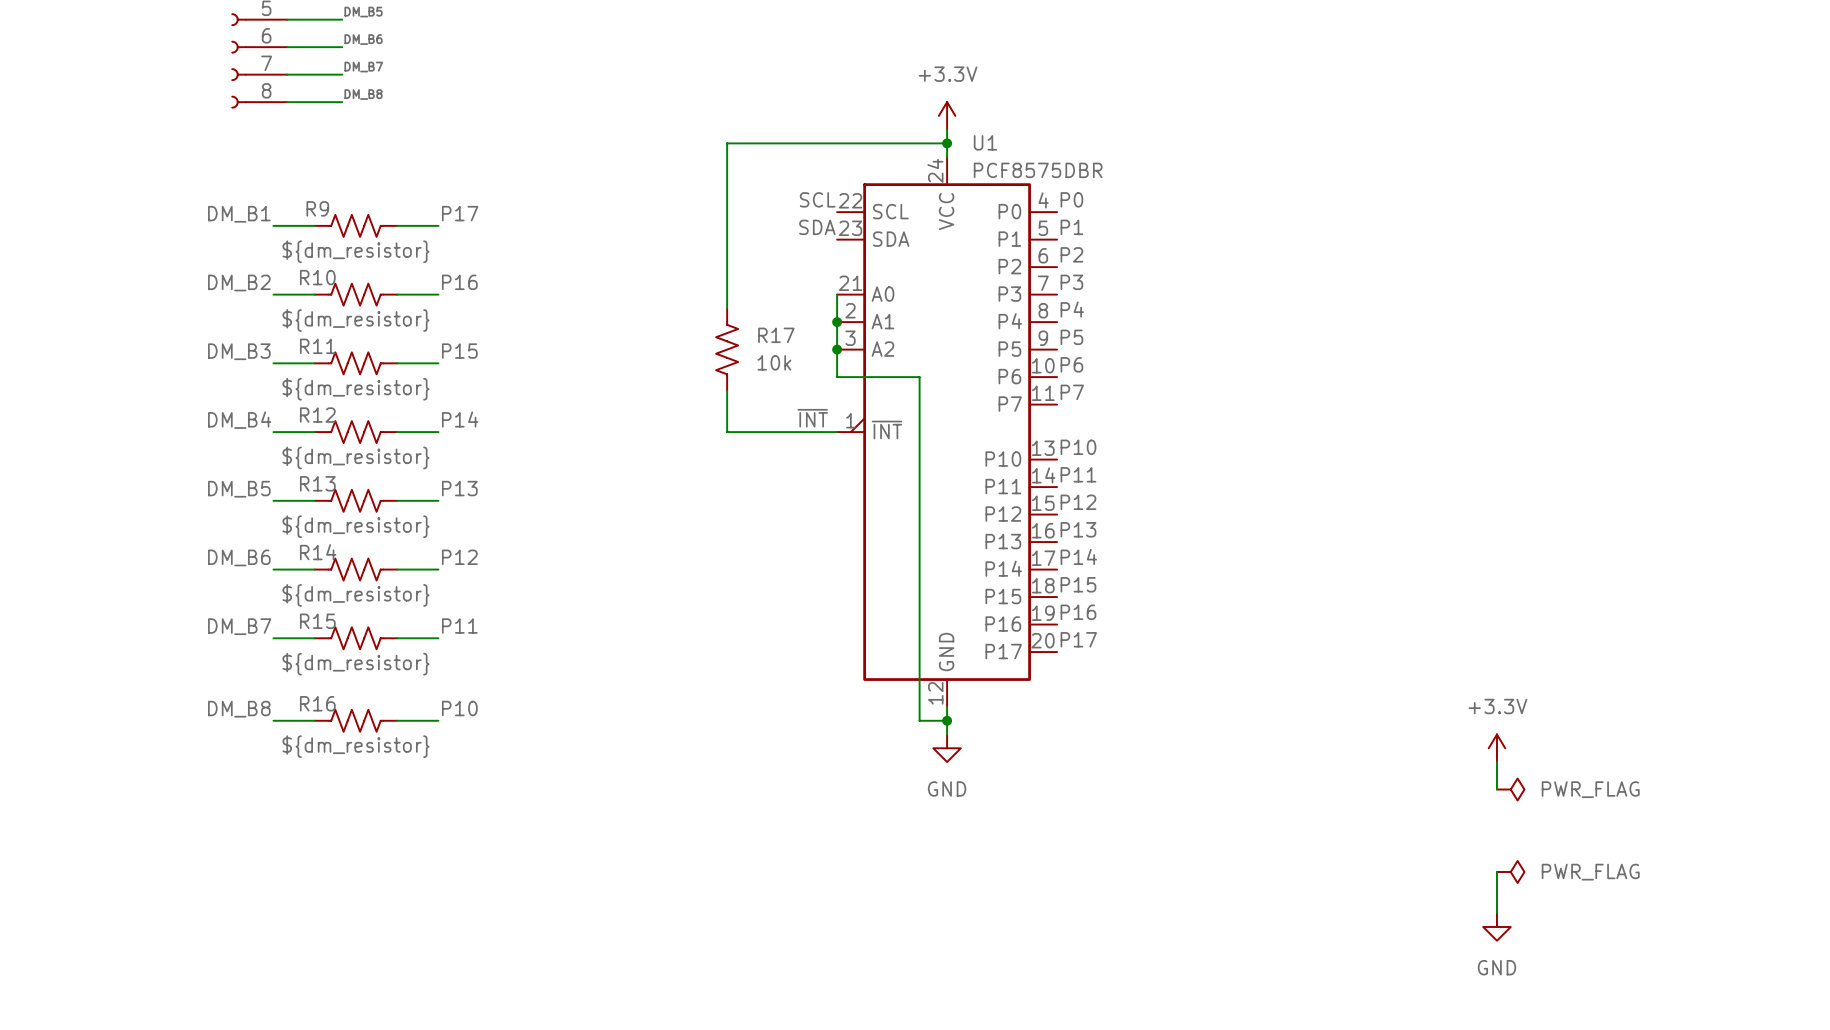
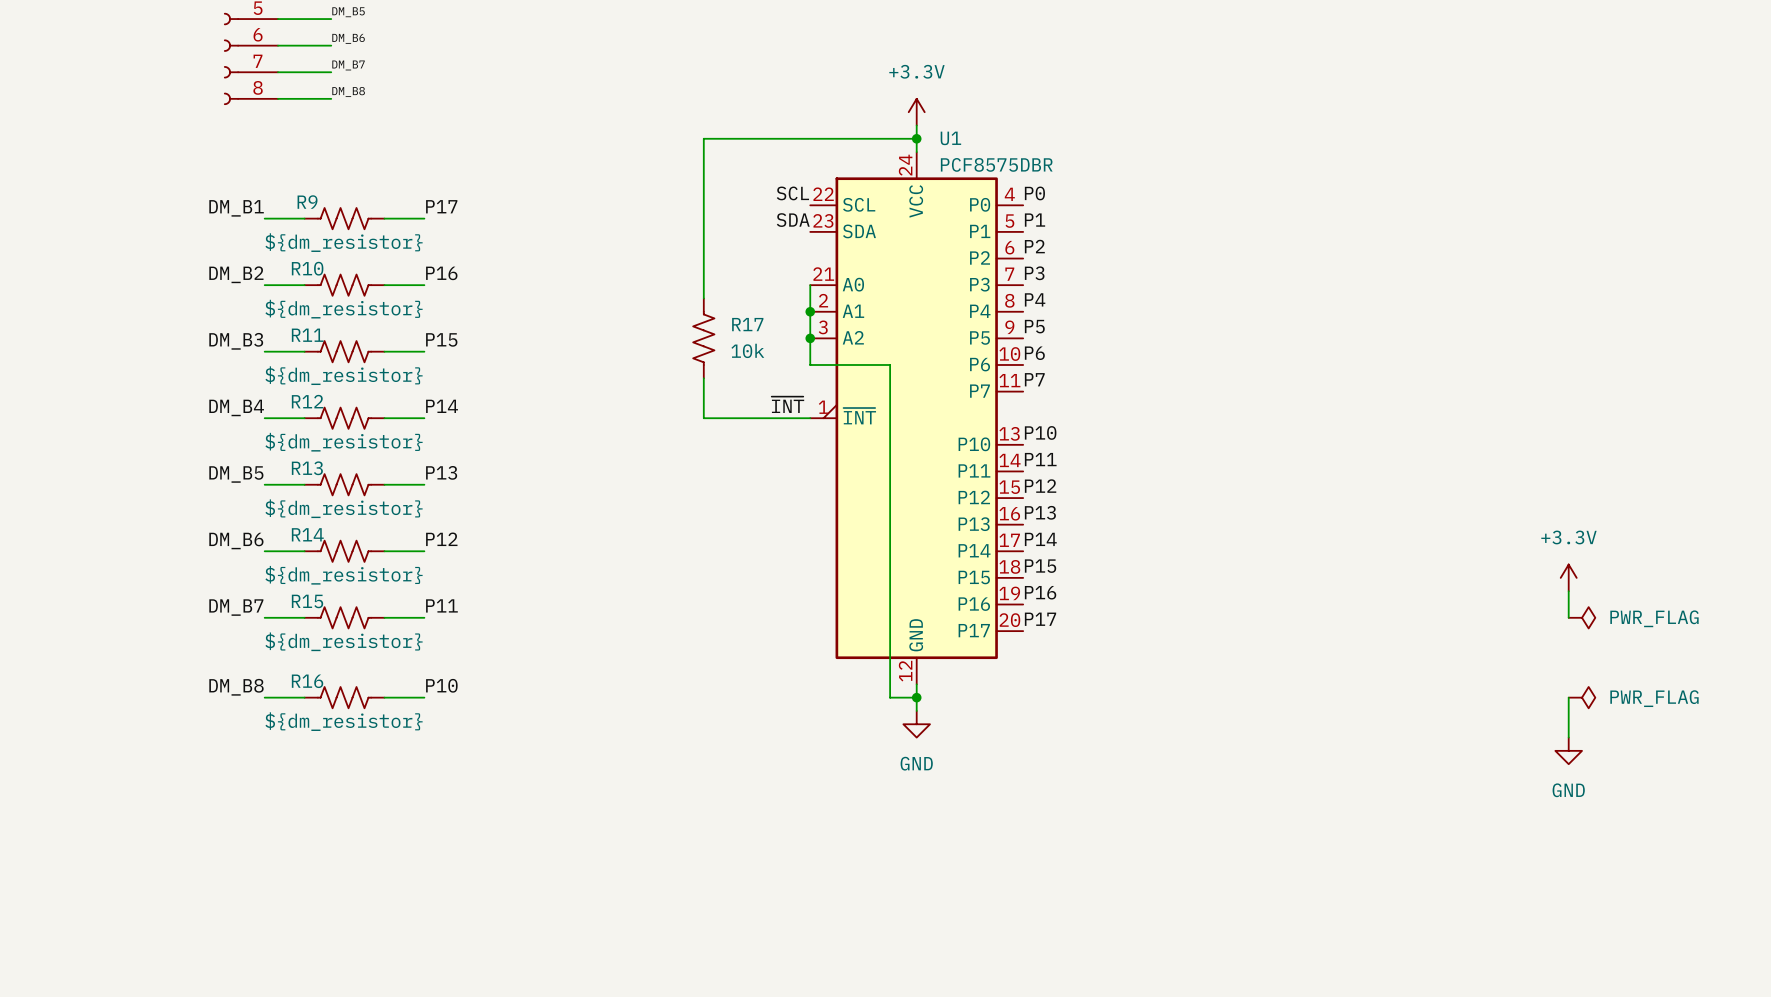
power symbol: none -> PWR_FLAG (1582, 617)
power symbol: none -> PWR_FLAG (1582, 697)
power symbol position: +3.3V (1496, 748) -> +3.3V (1568, 577)
wire: (1496, 762) (1496, 789) -> (1568, 591) (1568, 617)
power symbol: PWR_FLAG (1510, 789) -> none
wire: (1496, 871) (1496, 913) -> (1568, 697) (1568, 737)
power symbol: PWR_FLAG (1510, 871) -> none
power symbol position: GND (1496, 926) -> GND (1568, 750)

